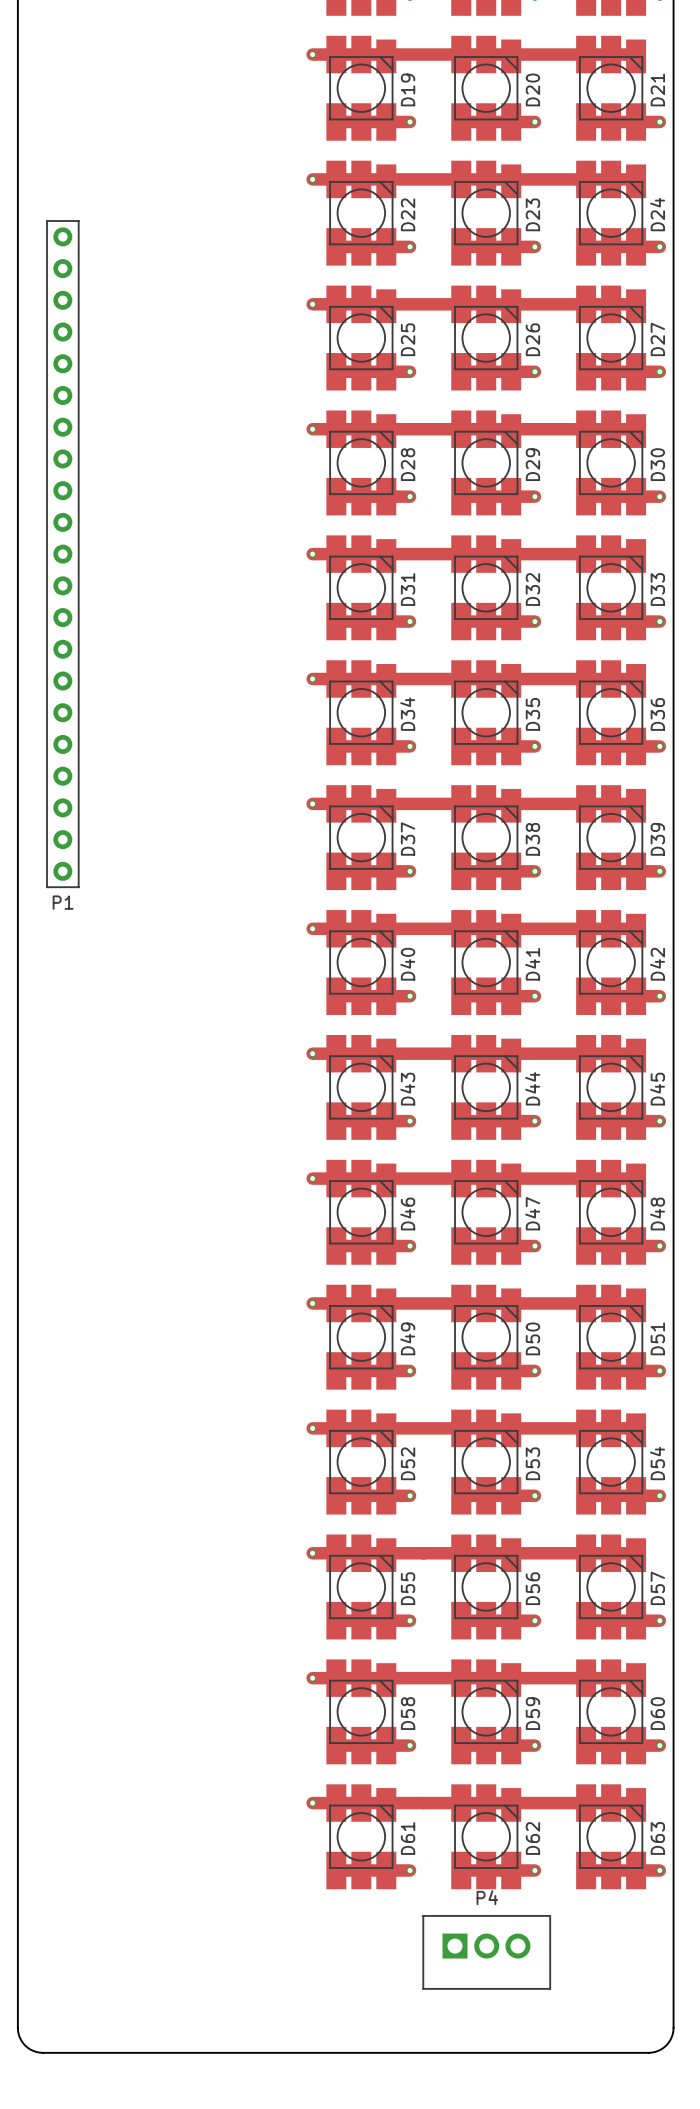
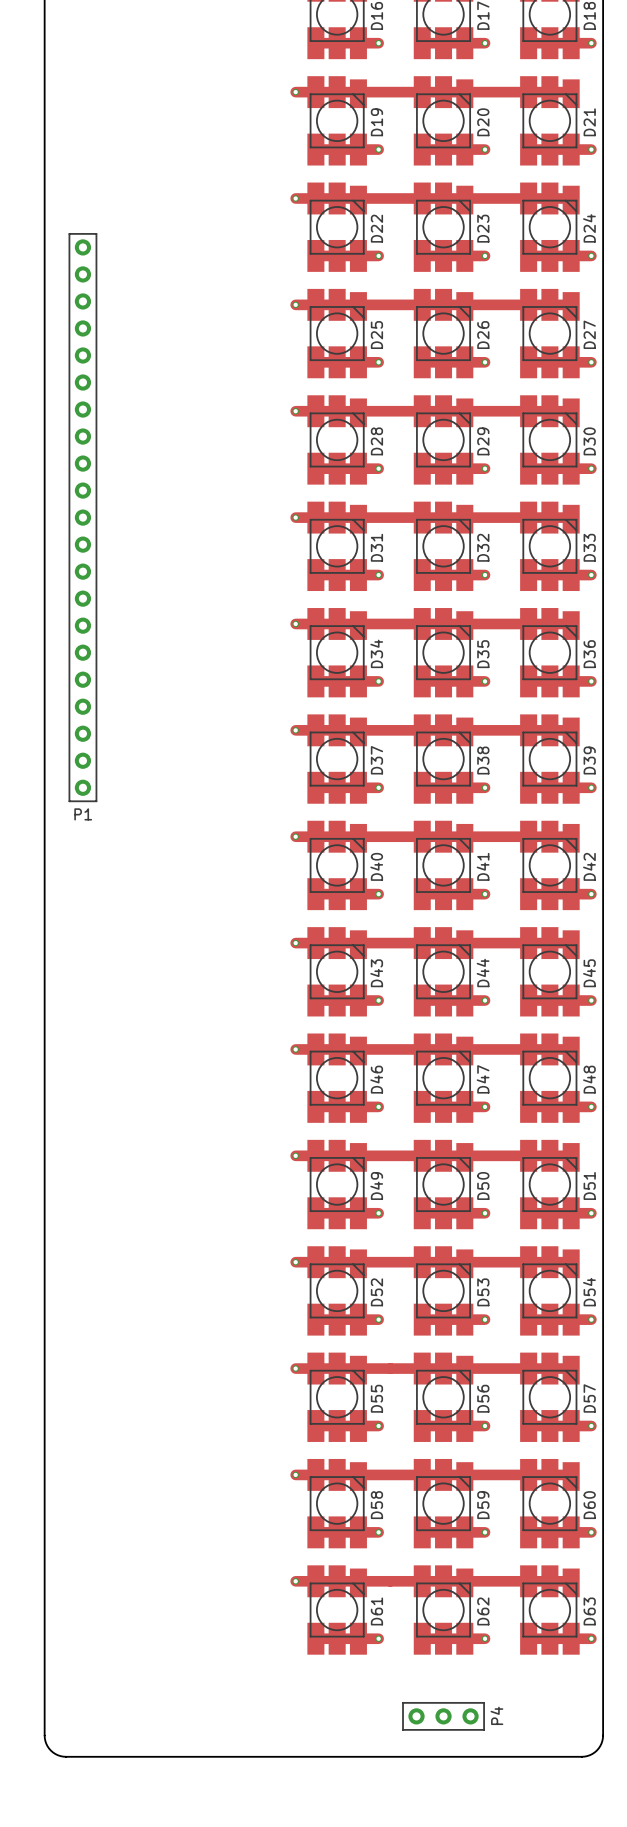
P4 name position: P4 (487, 1897) -> P4 (496, 1715)
P4 footprint: [422, 1914, 552, 1990] -> [402, 1702, 485, 1731]
board edge: (17, 1984) (17, 2027) (19, 2037) (27, 2047) (42, 2052) (651, 2052) (666, 2045) (672, 2034) (673, 1984) -> (44, 1735) (46, 1743) (50, 1750) (57, 1755) (65, 1756) (581, 1756) (589, 1755) (596, 1750) (601, 1743) (603, 1735)

